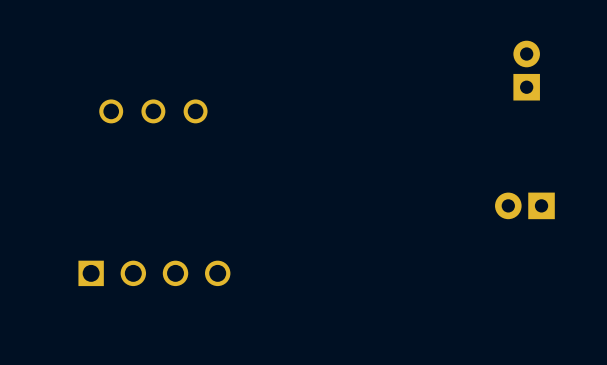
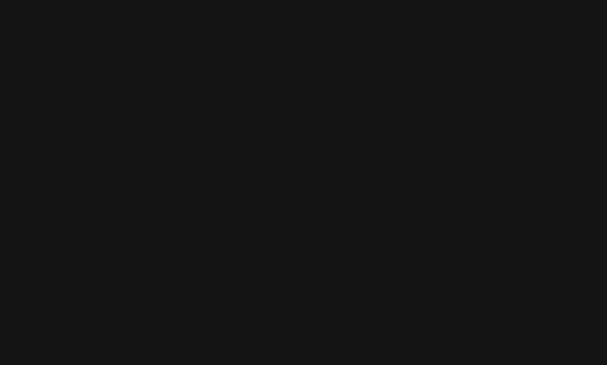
part: (526, 70) -> none
part: (153, 111) -> none
part: (524, 205) -> none
part: (154, 273) -> none

